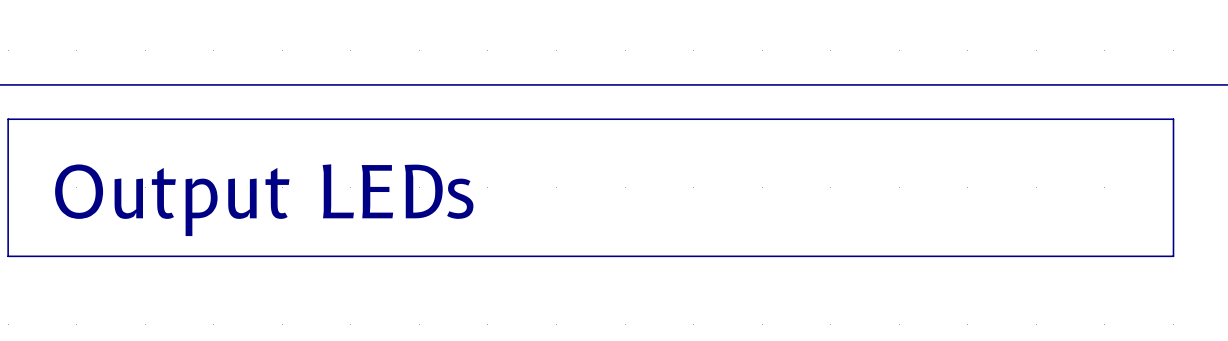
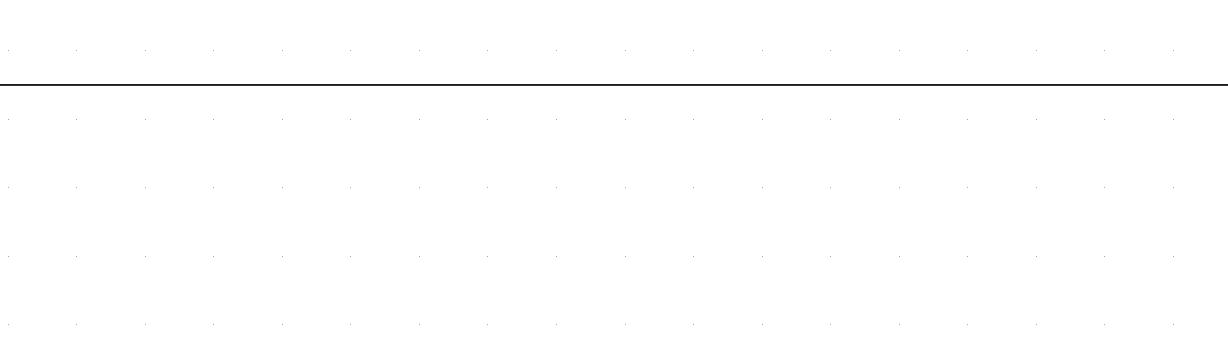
line: (8, 119) (1173, 119) (1173, 256) (8, 256) (8, 119) -> none
text: Output LEDs (264, 200) -> none

